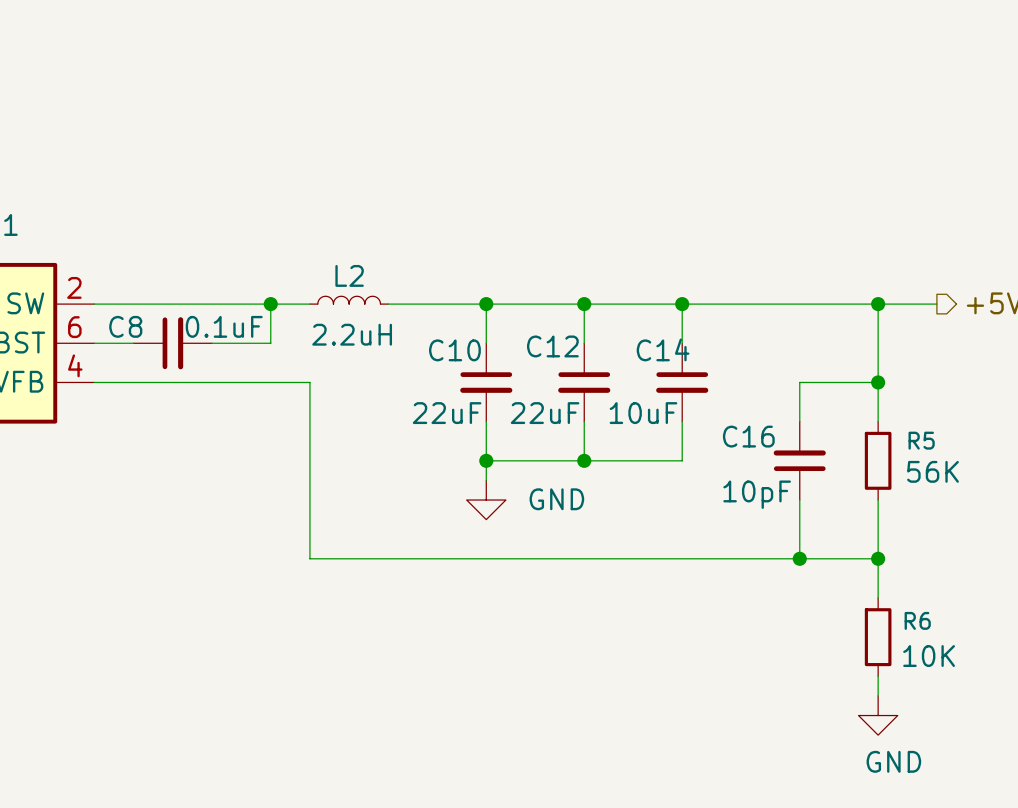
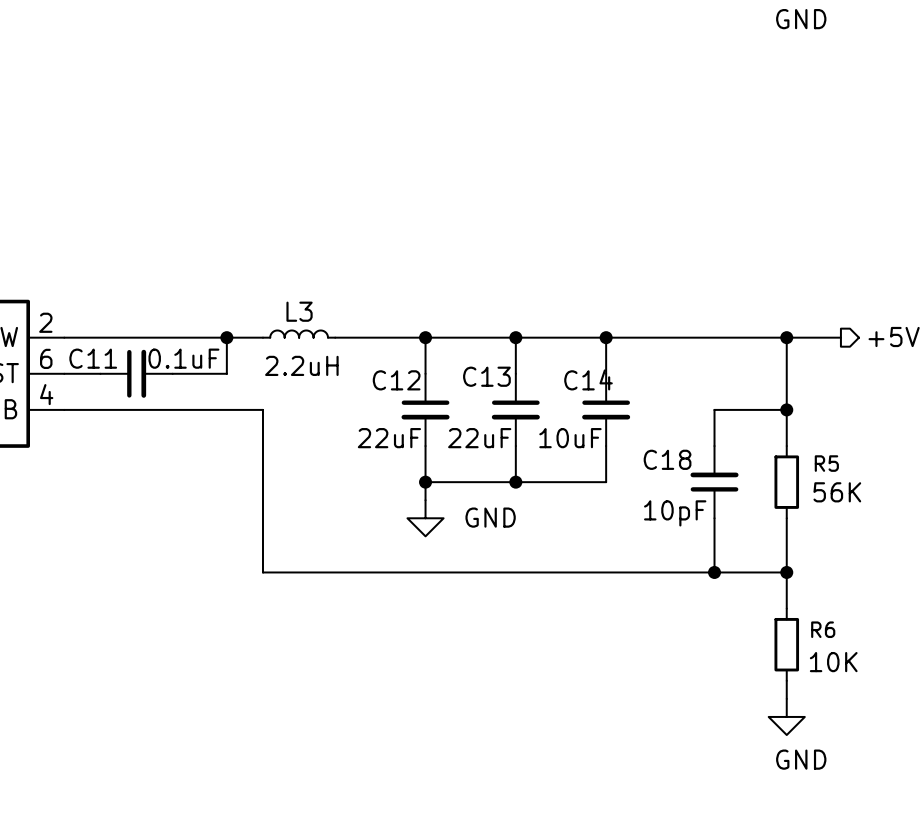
L2 name: L2 (349, 275) -> L3 (299, 311)
C8 name: C8 (125, 326) -> C11 (93, 358)
C12 name: C12 (552, 346) -> C13 (486, 376)
C10 name: C10 (454, 350) -> C12 (396, 380)
C16 name: C16 (748, 436) -> C18 (667, 459)

